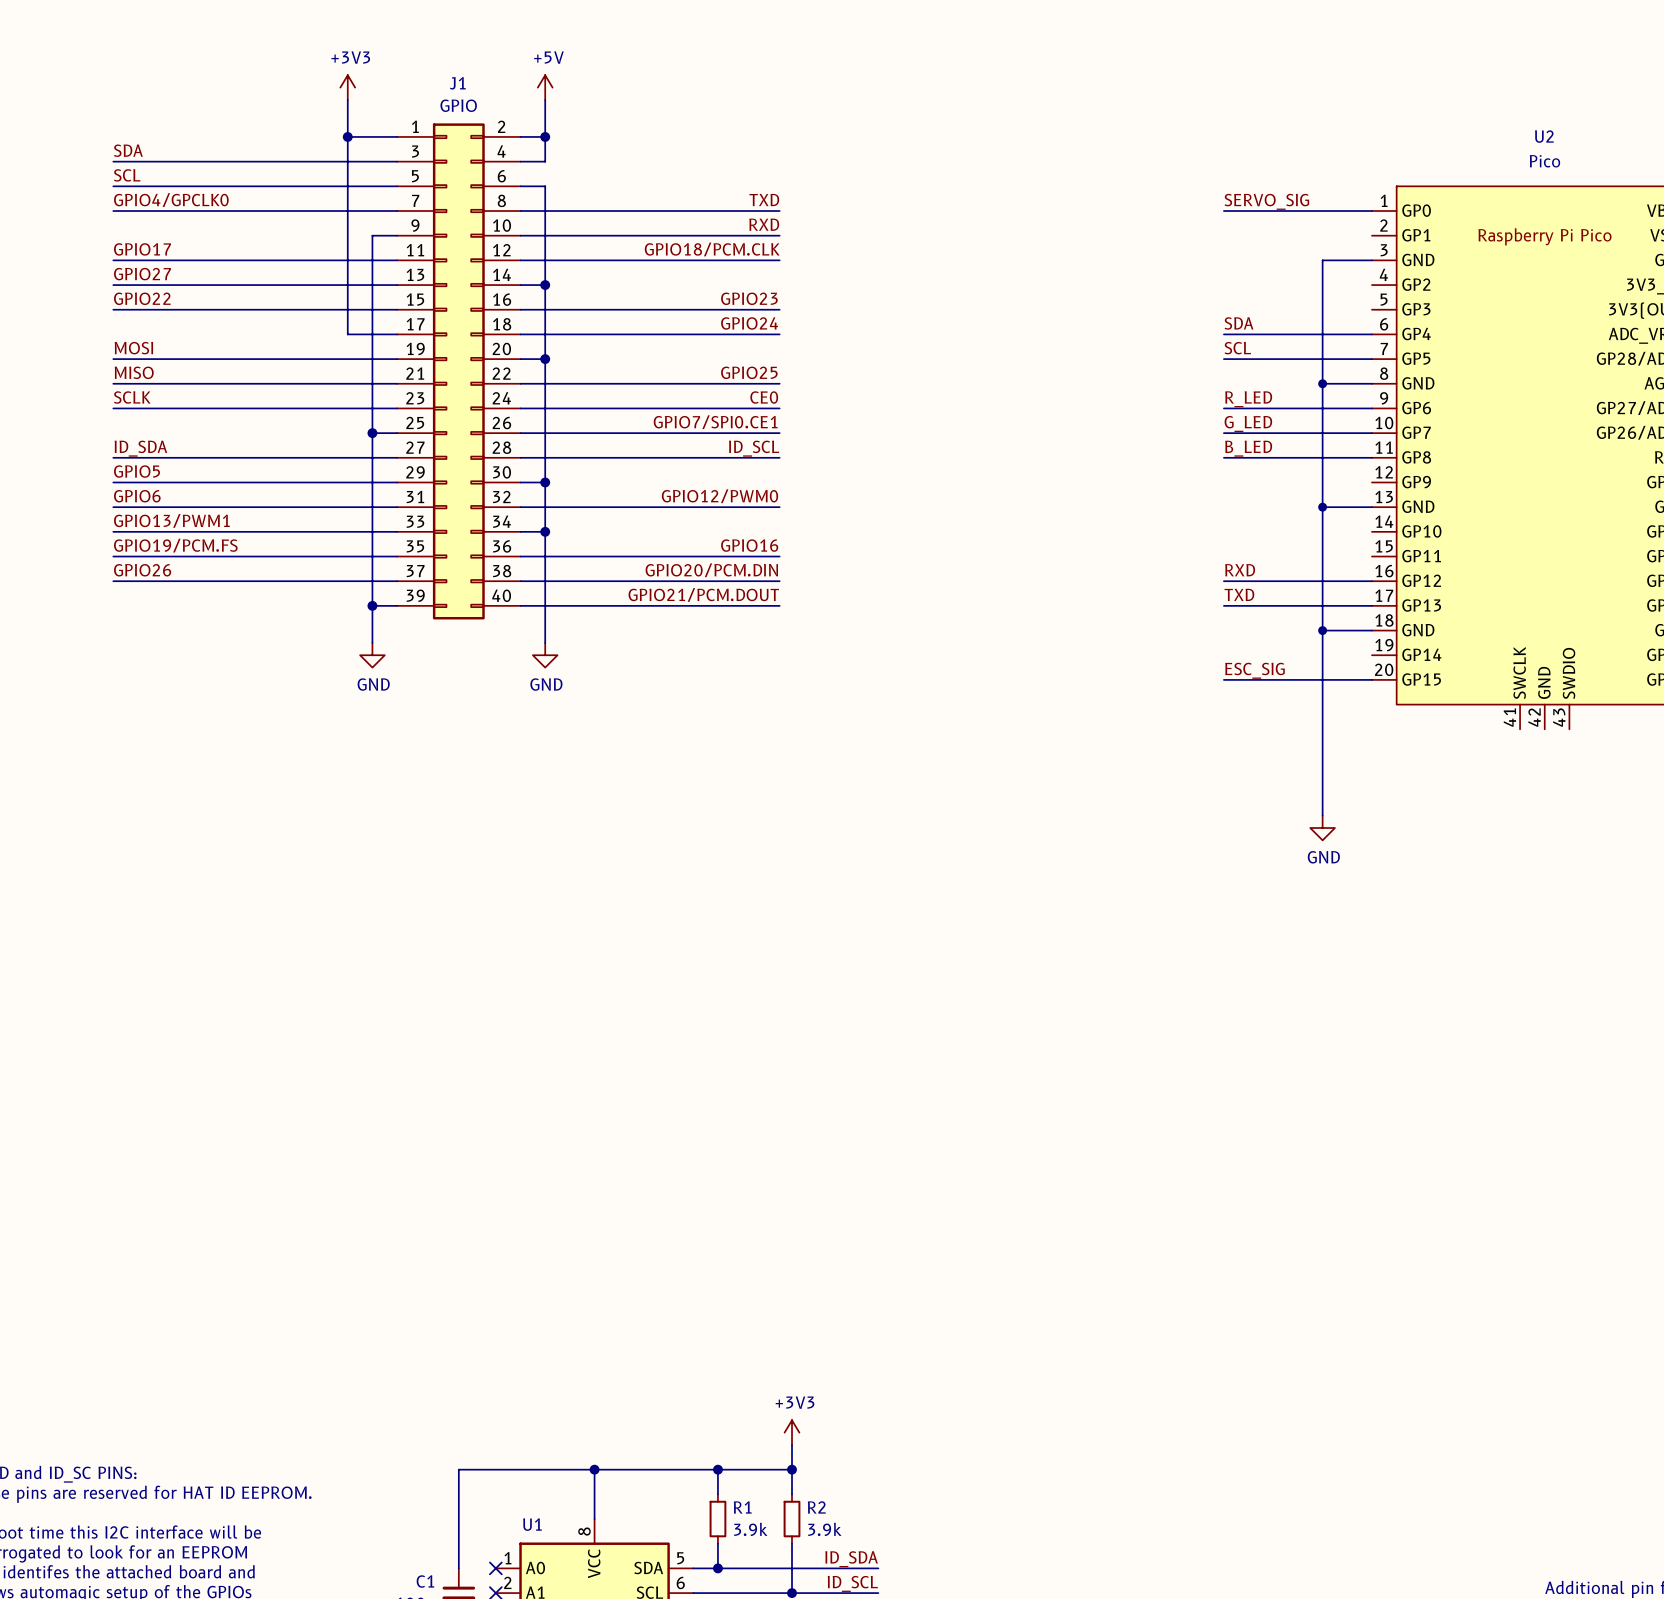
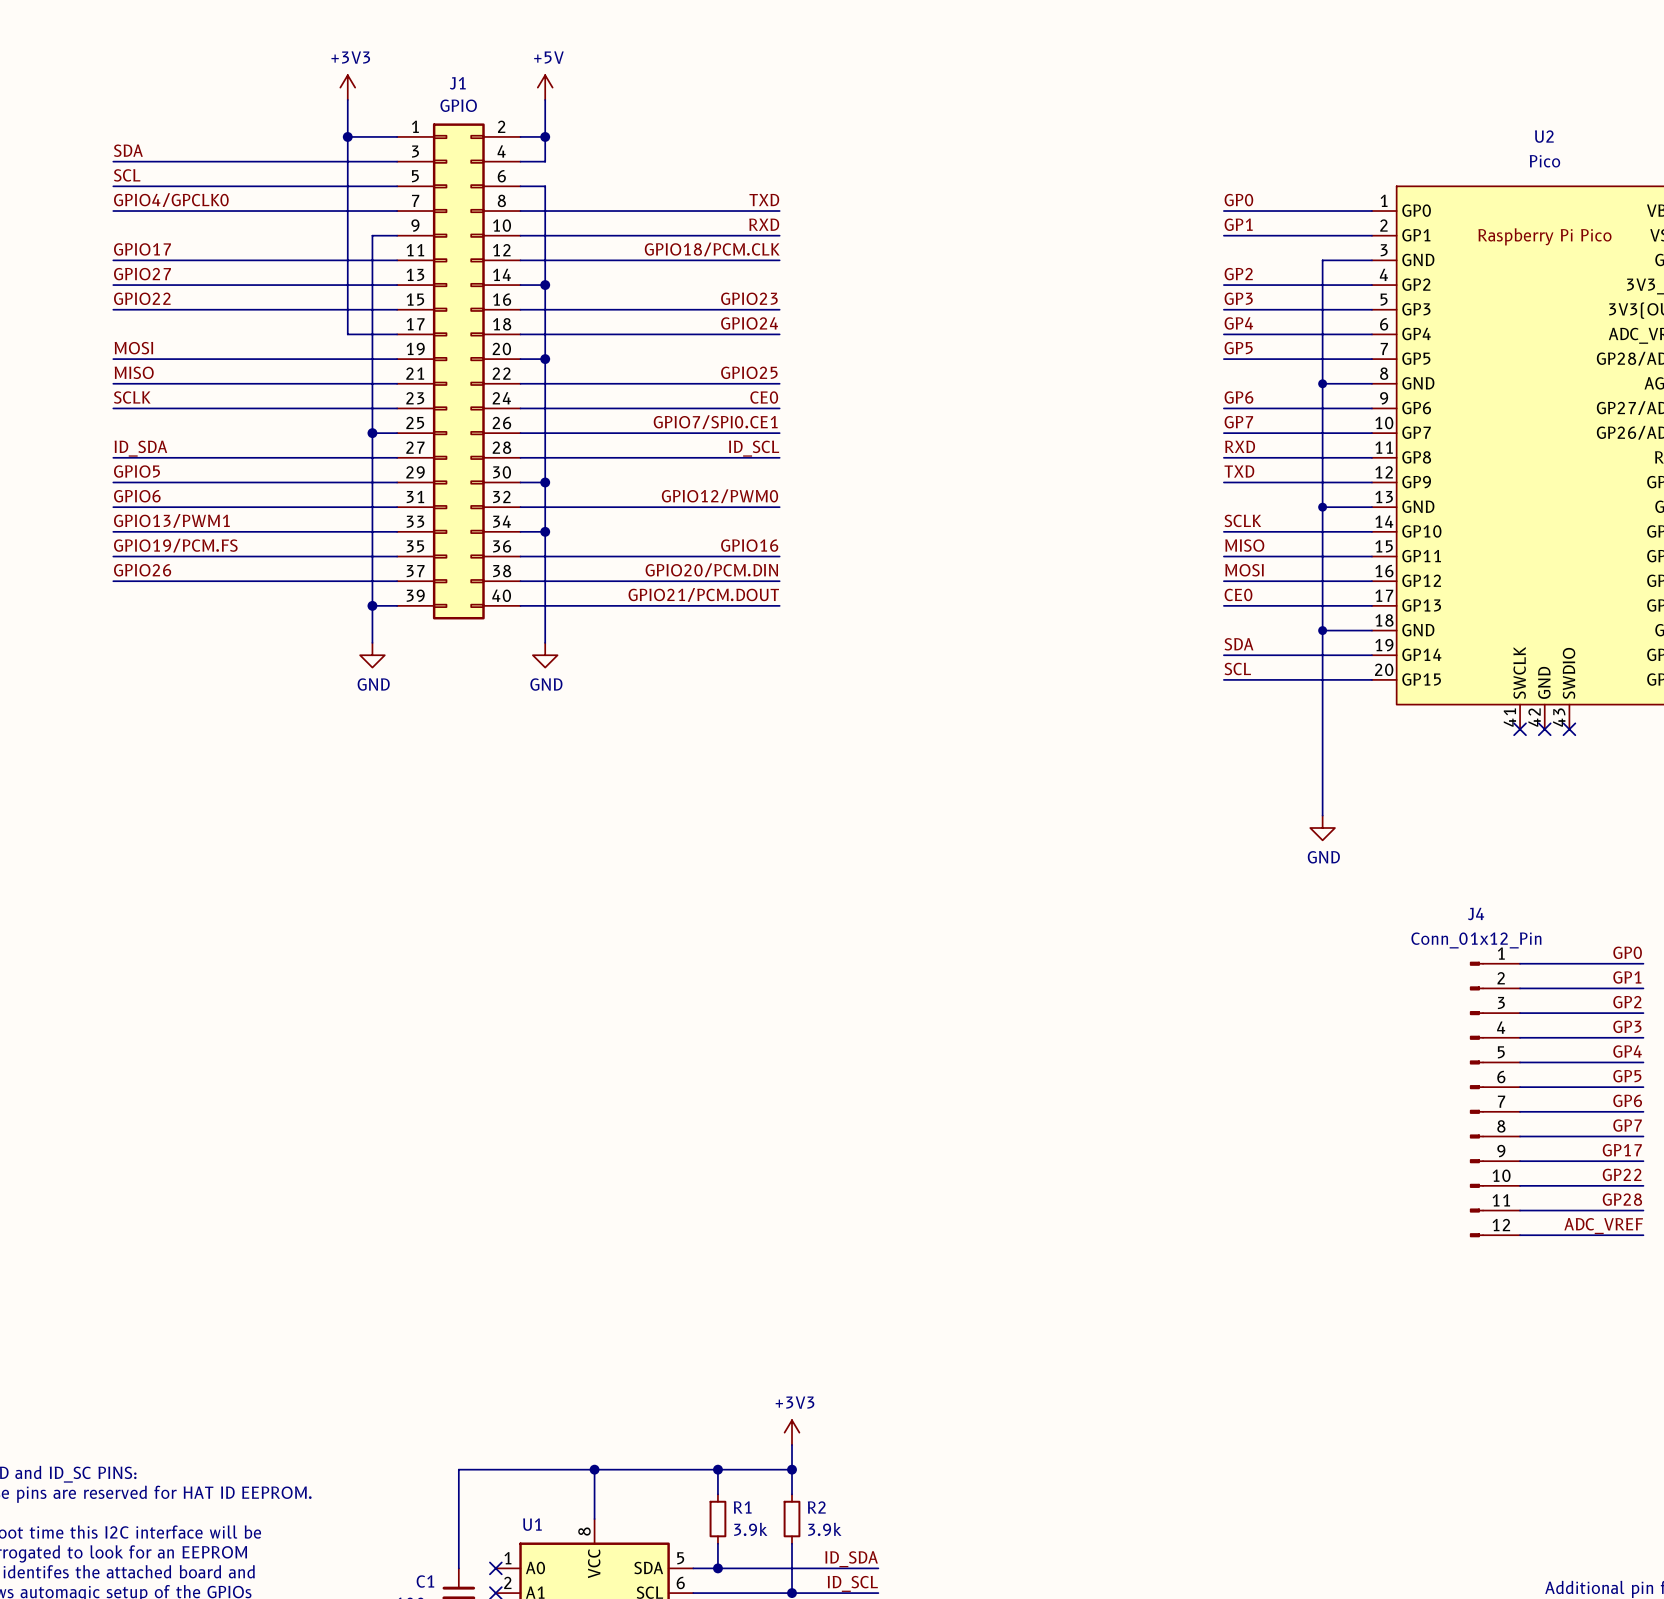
label: SERVO_SIG (1266, 201) -> GP0 (1238, 200)
label: none -> GP1 (1238, 224)
wire: none -> (1223, 235) (1371, 235)
label: none -> GP2 (1238, 274)
wire: none -> (1223, 285) (1371, 285)
label: none -> GP3 (1238, 298)
wire: none -> (1223, 309) (1371, 309)
label: SDA (1238, 323) -> GP4 (1238, 323)
label: SCL (1237, 348) -> GP5 (1238, 348)
label: R_LED (1248, 399) -> GP6 (1238, 397)
label: G_LED (1248, 423) -> GP7 (1238, 422)
label: B_LED (1248, 448) -> RXD (1240, 446)
label: none -> TXD (1239, 471)
wire: none -> (1223, 482) (1371, 482)
label: none -> SCLK (1242, 520)
wire: none -> (1223, 531) (1371, 531)
label: none -> MISO (1244, 545)
wire: none -> (1223, 556) (1371, 556)
label: RXD (1240, 570) -> MOSI (1244, 570)
label: TXD (1239, 594) -> CE0 (1238, 594)
label: none -> SDA (1238, 644)
wire: none -> (1223, 655) (1371, 655)
label: ESC_SIG (1254, 670) -> SCL (1237, 668)
no-connect mark: none -> (1520, 729)
no-connect mark: none -> (1544, 729)
no-connect mark: none -> (1569, 729)
label: none -> GP0 (1627, 952)
wire: none -> (1520, 963) (1643, 963)
label: none -> GP1 (1627, 977)
wire: none -> (1520, 988) (1643, 988)
label: none -> GP2 (1627, 1002)
wire: none -> (1520, 1013) (1643, 1013)
label: none -> GP3 (1627, 1026)
wire: none -> (1520, 1037) (1643, 1037)
label: none -> GP4 (1627, 1051)
wire: none -> (1520, 1062) (1643, 1062)
label: none -> GP5 (1627, 1076)
wire: none -> (1520, 1087) (1643, 1087)
J4: none -> Conn_01x12_Pin (1495, 1099)
label: none -> GP6 (1627, 1100)
wire: none -> (1520, 1111) (1643, 1111)
label: none -> GP7 (1627, 1125)
wire: none -> (1520, 1136) (1643, 1136)
label: none -> GP17 (1622, 1150)
wire: none -> (1520, 1161) (1643, 1161)
label: none -> GP22 (1622, 1174)
wire: none -> (1520, 1185) (1643, 1185)
label: none -> GP28 (1622, 1199)
wire: none -> (1520, 1210) (1643, 1210)
label: none -> ADC_VREF (1603, 1226)
wire: none -> (1520, 1235) (1643, 1235)

